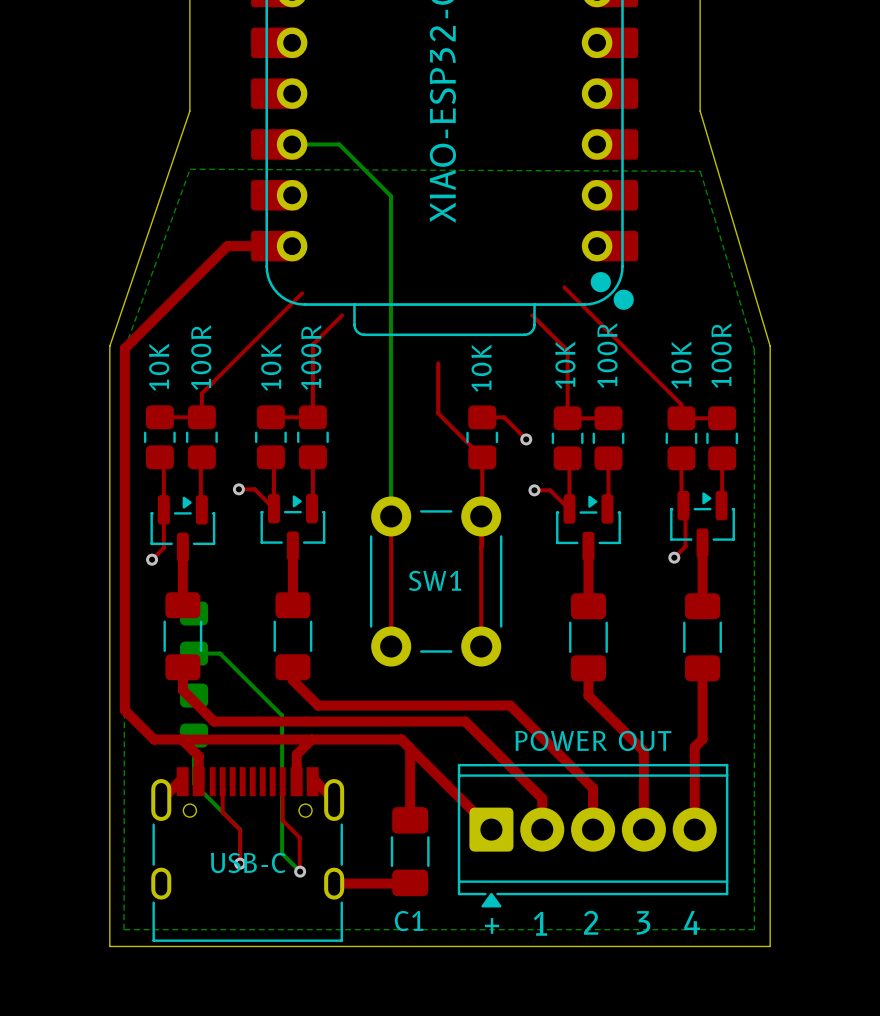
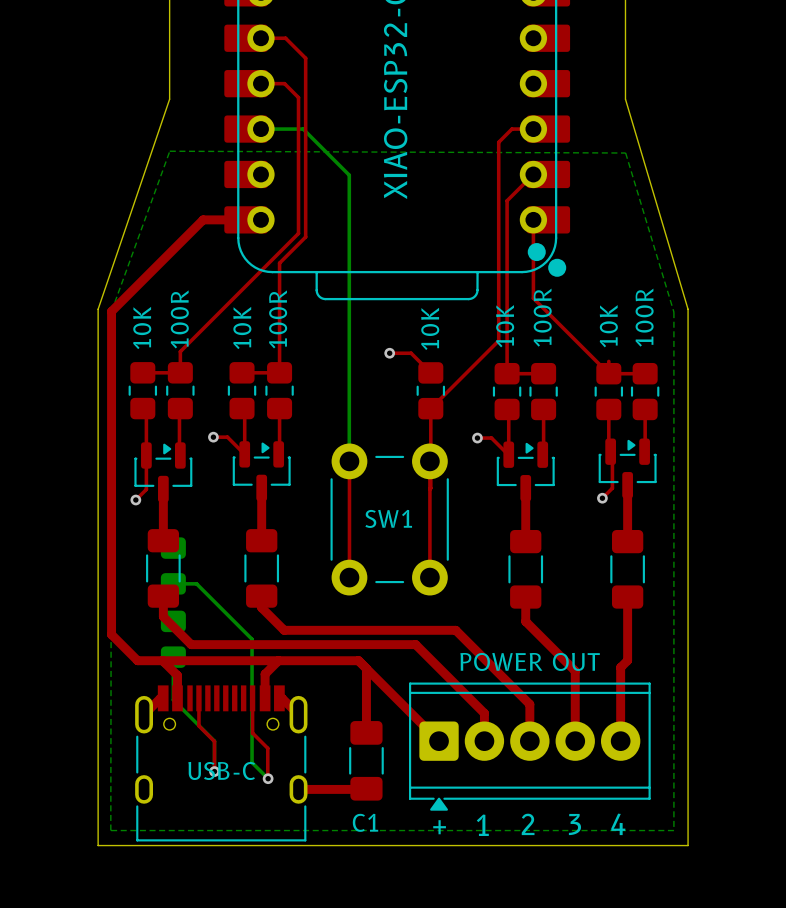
top track: none -> (260, 83) (284, 83) (298, 97) (298, 233) (269, 262)
top track: none -> (533, 219) (533, 298) (608, 373)
top track: (564, 287) (681, 404) -> none
top track: (342, 315) (312, 344) -> (260, 38) (285, 38) (305, 58) (305, 237) (279, 263) (279, 307)
top track: (532, 315) (567, 350) -> (533, 174) (507, 200) (507, 313)
top track: (438, 363) (438, 413) (482, 457) -> (533, 129) (511, 129) (498, 142) (498, 340) (430, 408)
top track: (482, 417) (504, 417) (526, 439) -> (430, 372) (411, 353) (389, 353)
via position: (526, 439) -> (389, 353)

